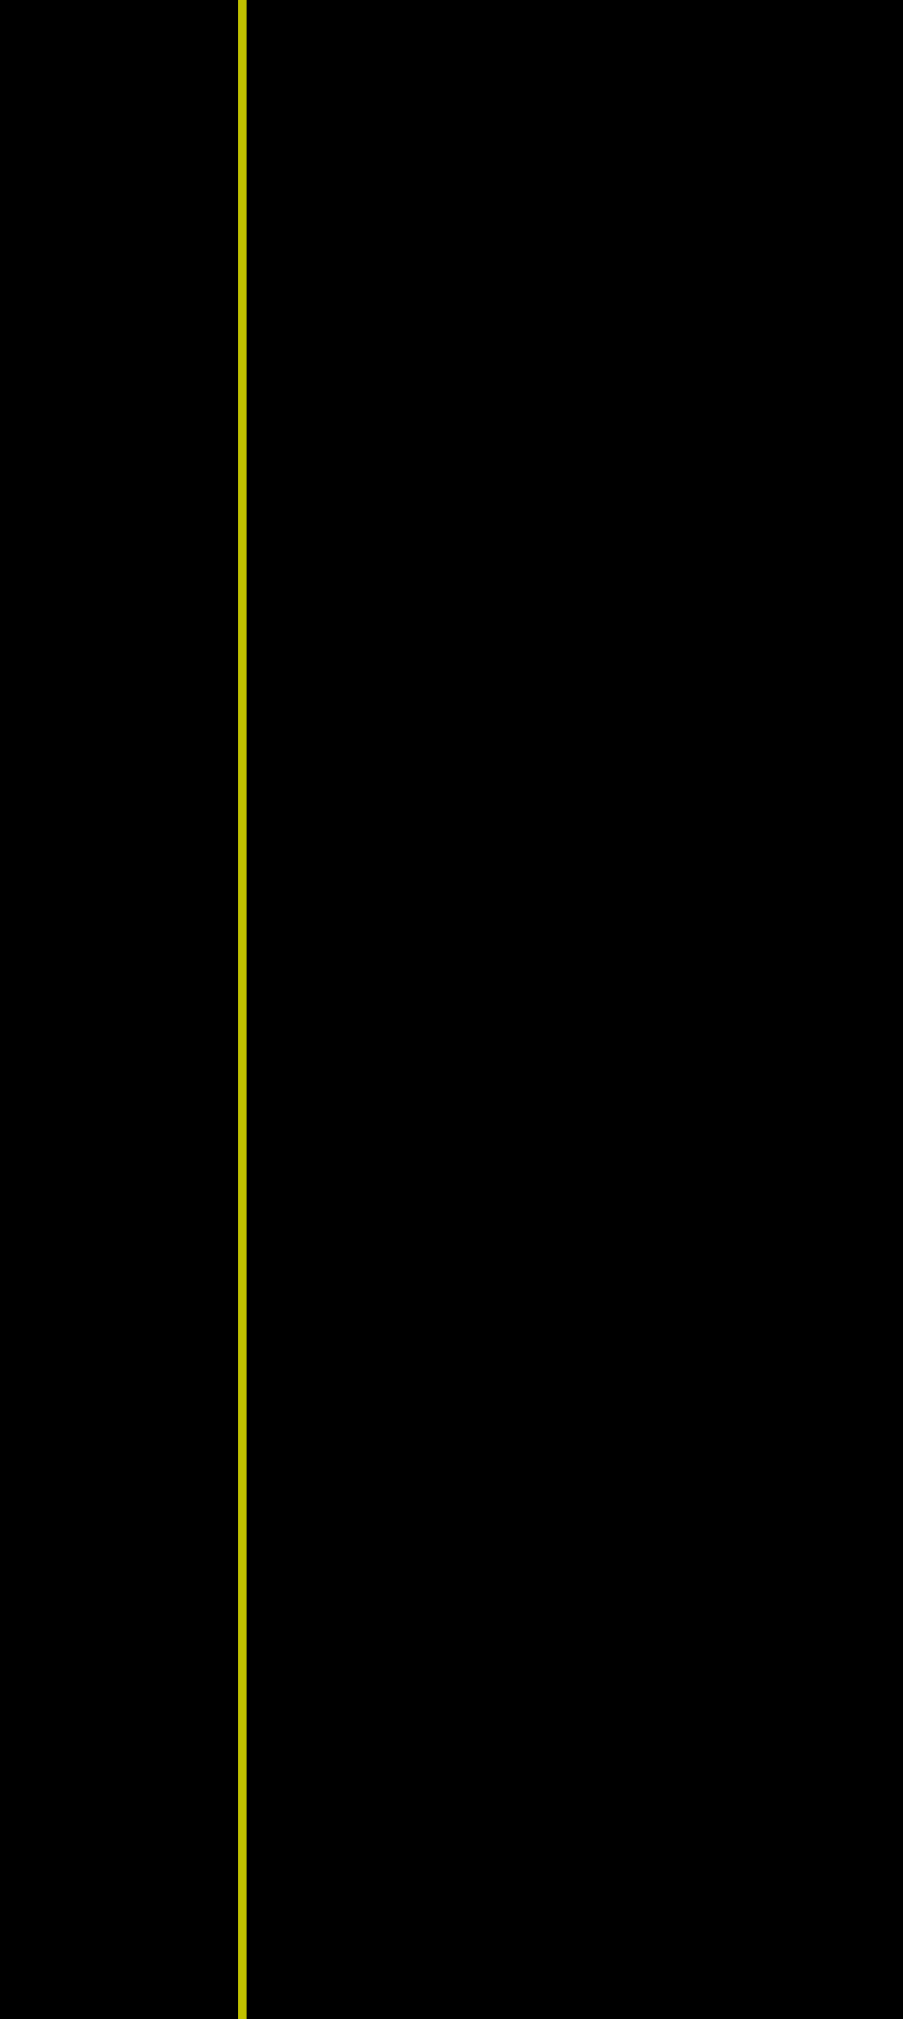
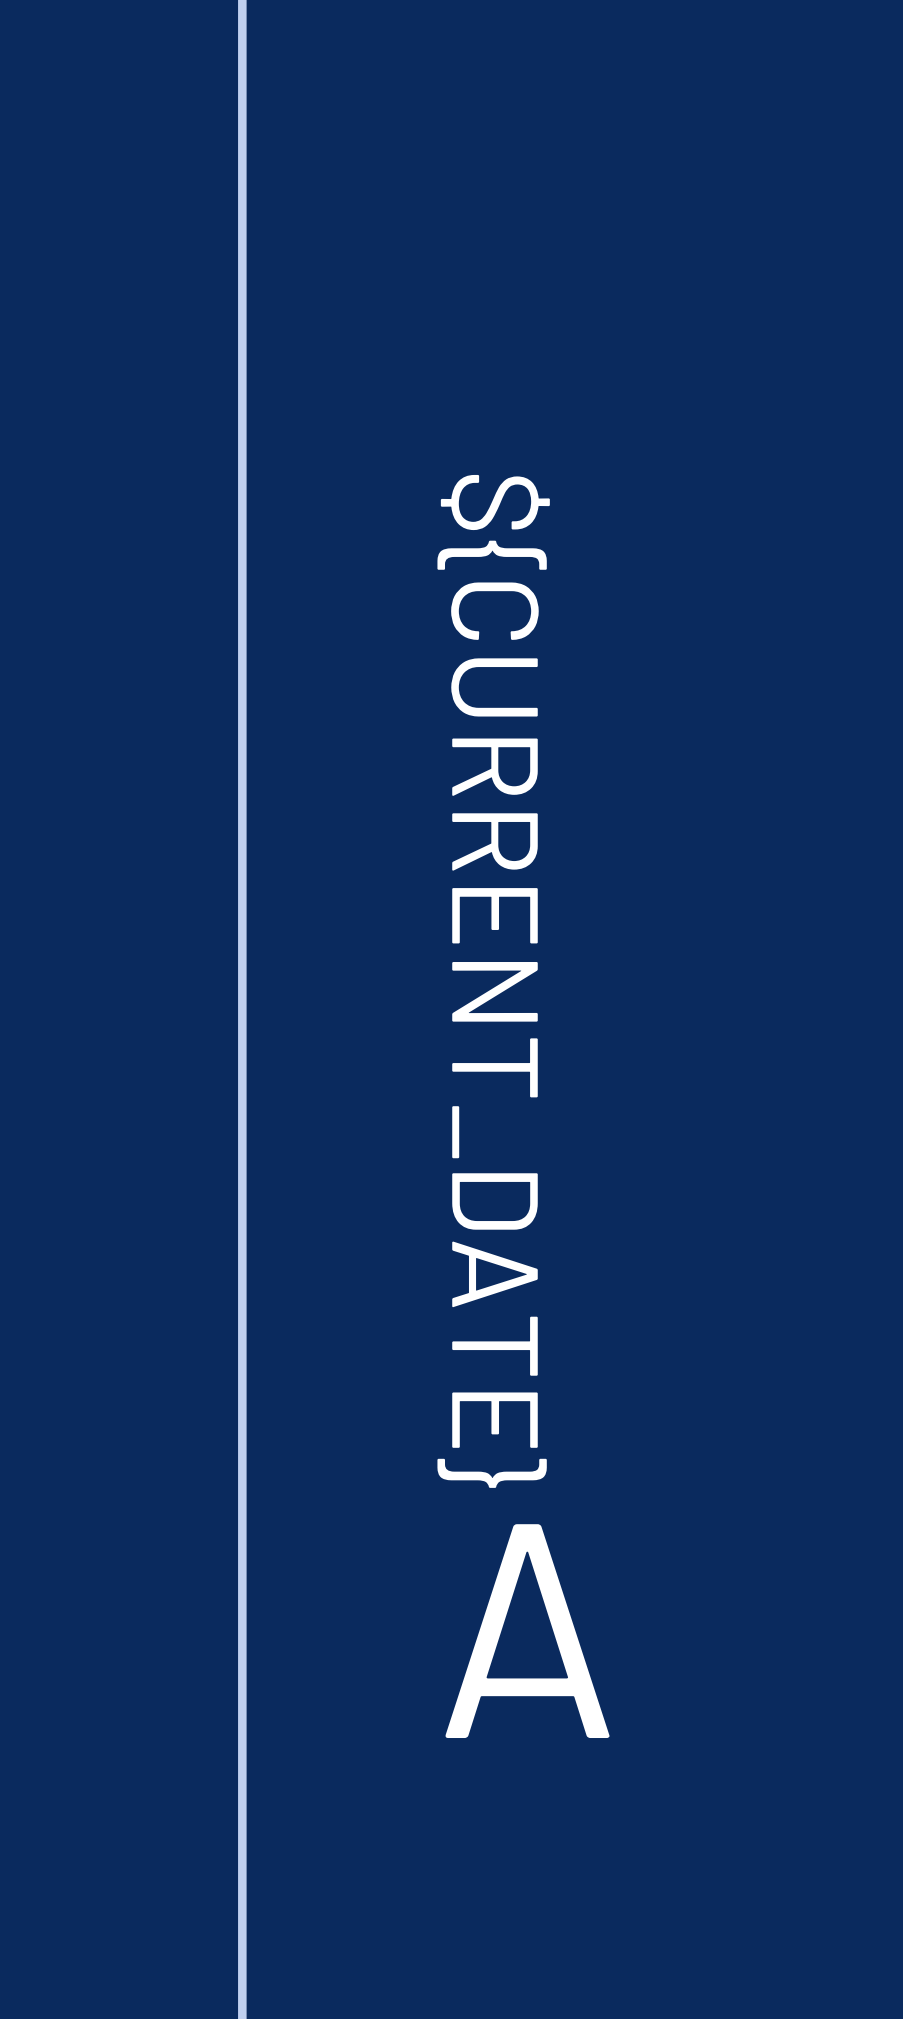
text: none -> ${CURRENT_DATE} (493, 981)
text: none -> A (527, 1631)

